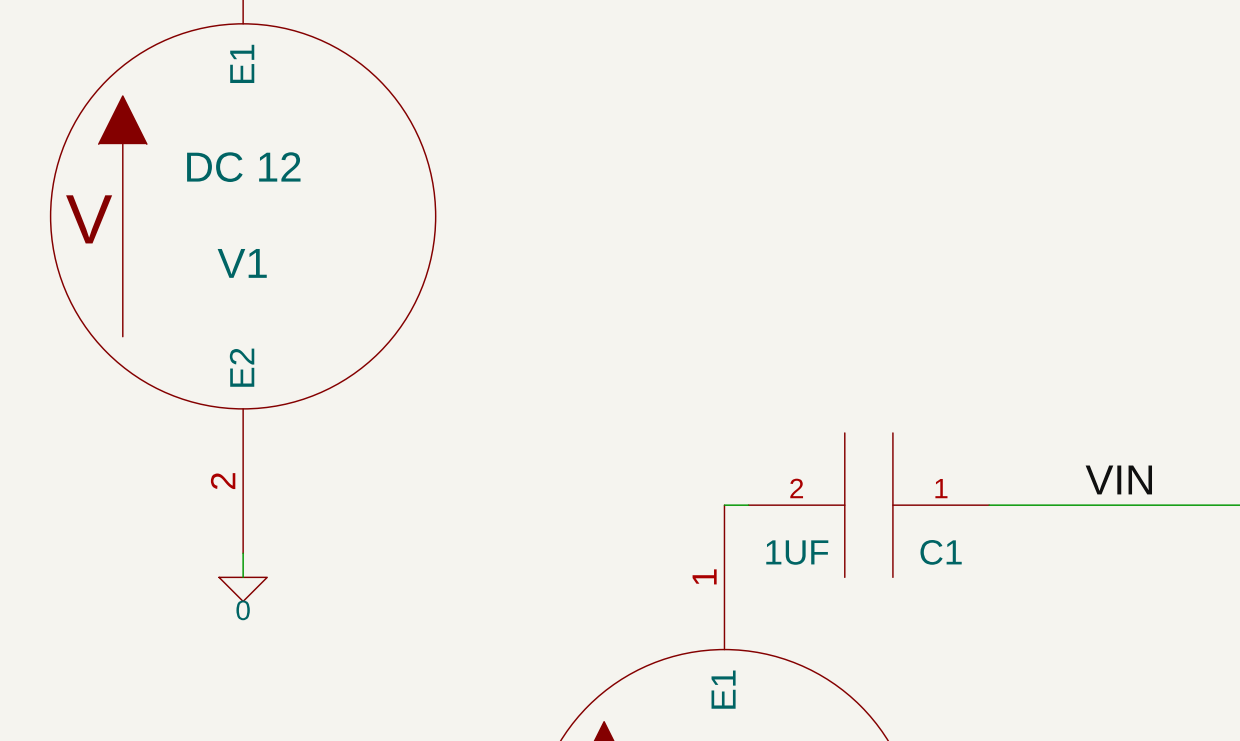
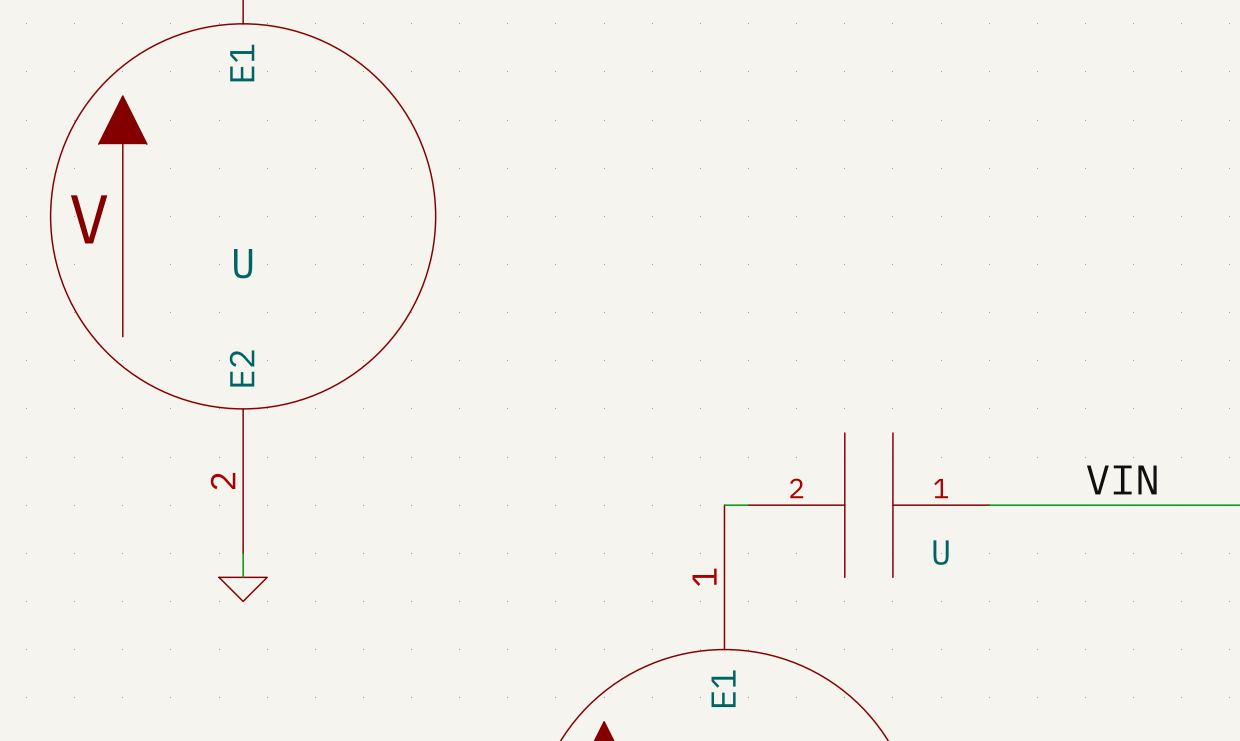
V1 value: DC 12 (243, 167) -> none
V1 name: V1 (242, 263) -> U (243, 263)
C1 value: 1UF (797, 552) -> none
C1 name: C1 (941, 552) -> U (941, 552)
power symbol text: 0 (243, 610) -> none

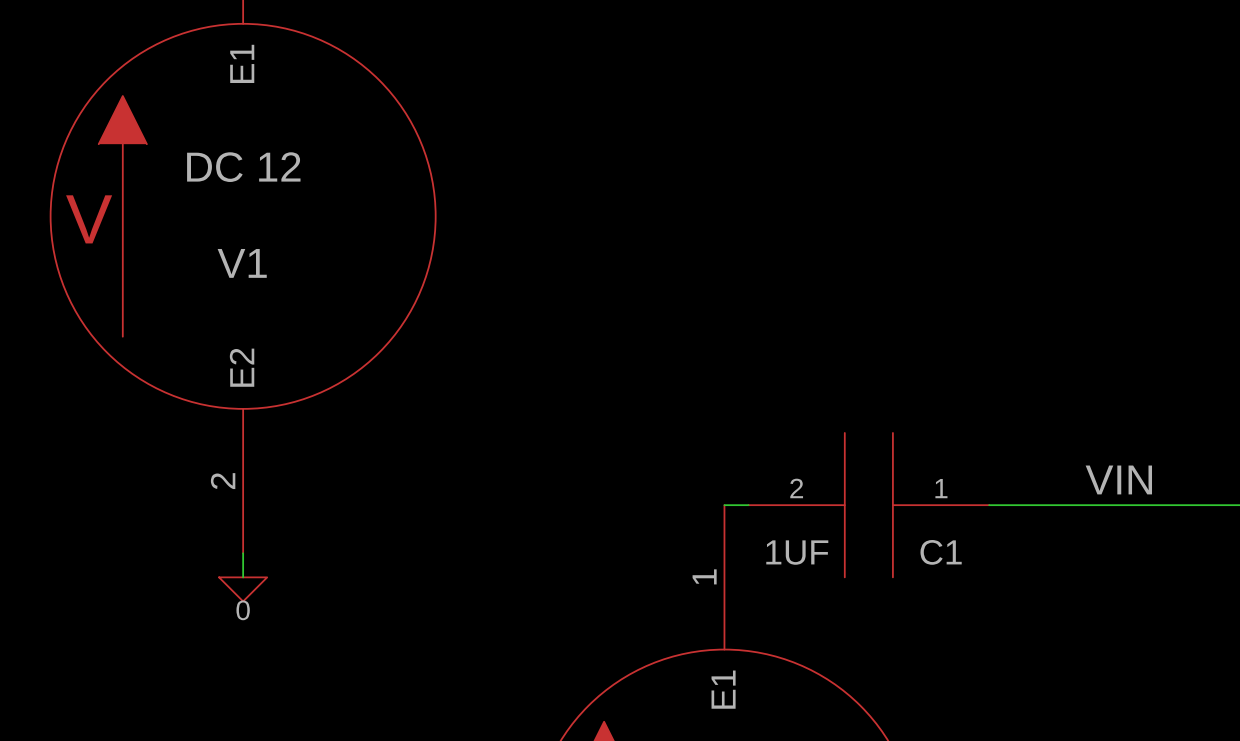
U value: none -> DC 12 (243, 167)
U name: U (243, 263) -> V1 (242, 263)
U value: none -> 1UF (797, 552)
U name: U (941, 552) -> C1 (941, 552)
power symbol text: none -> 0 (243, 610)

